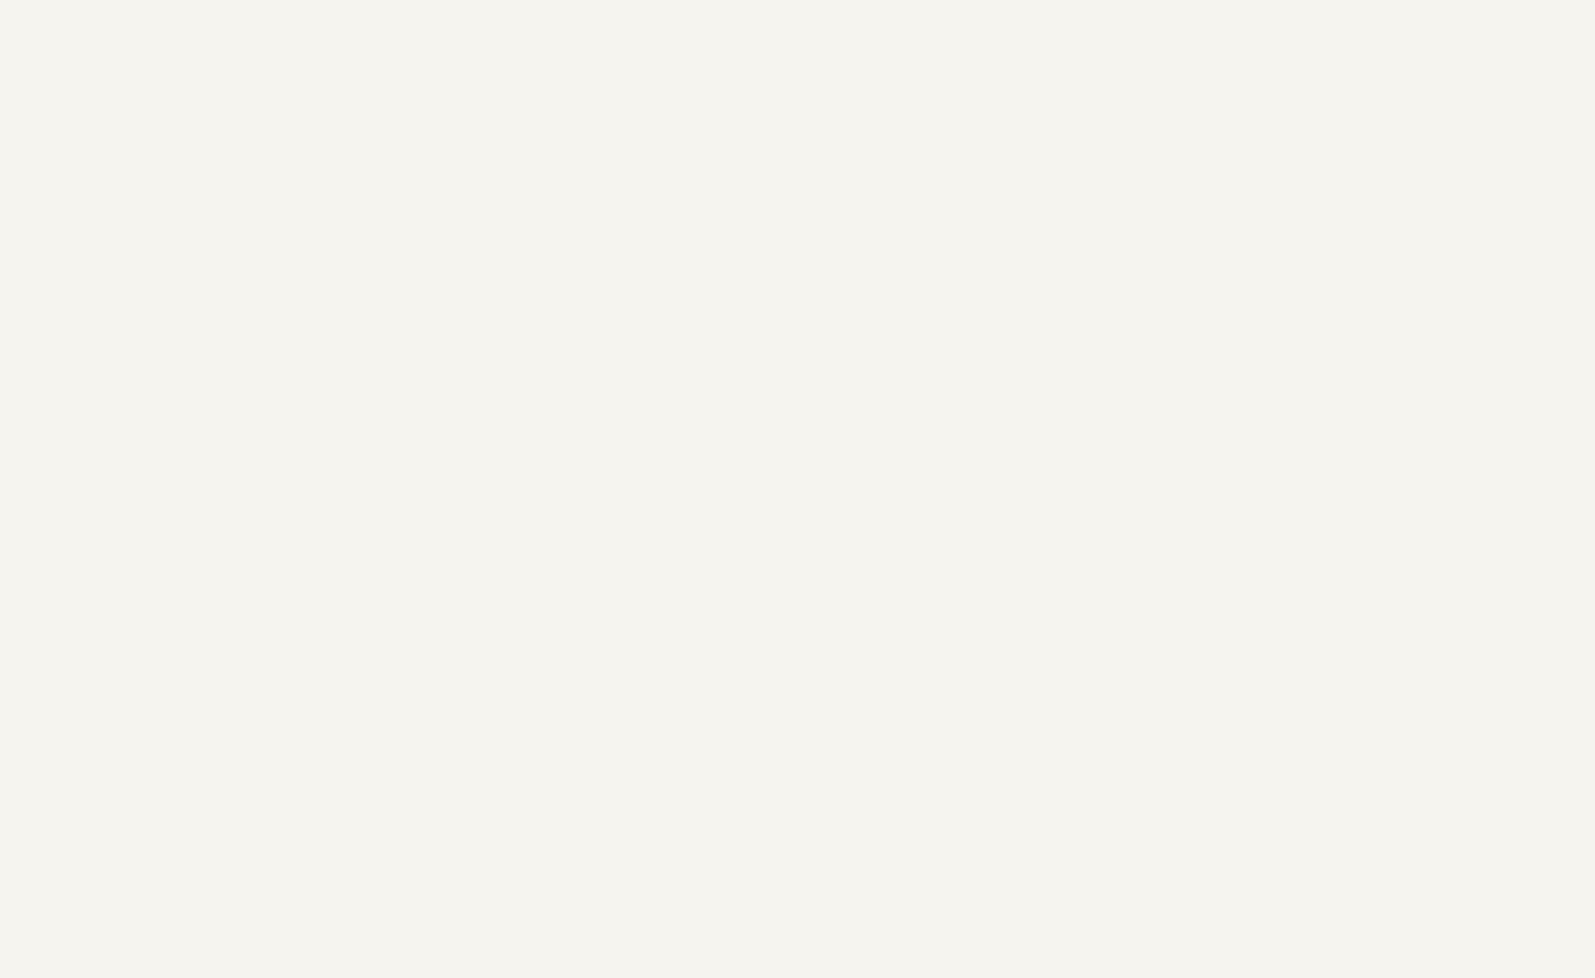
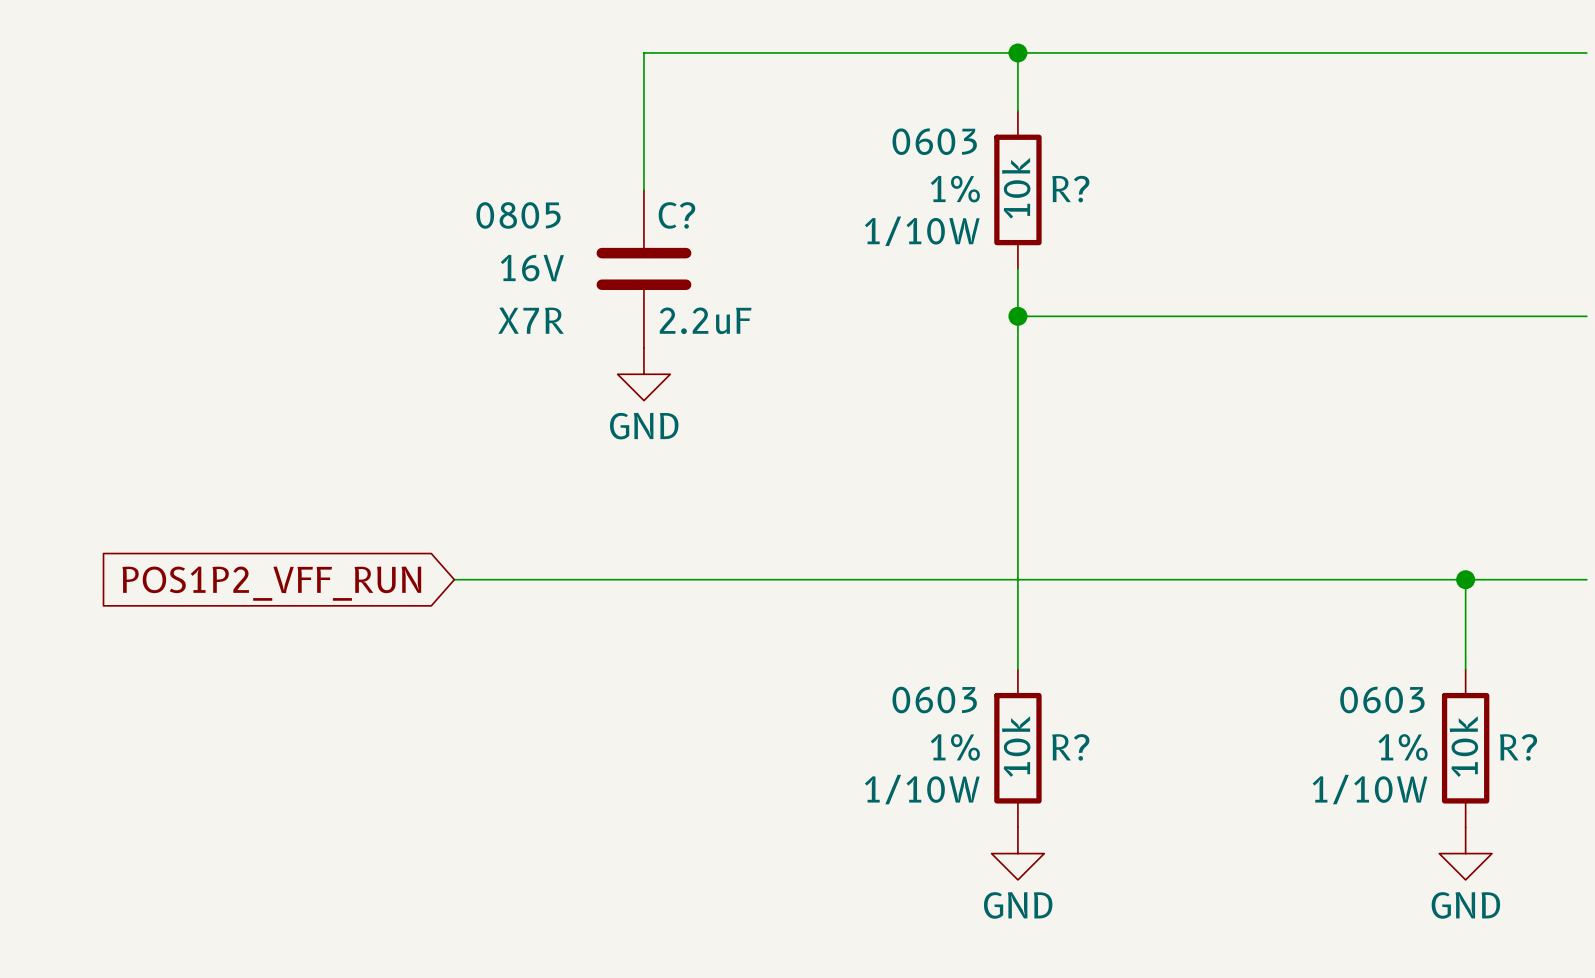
wire: none -> (1017, 52) (1017, 110)
junction: none -> (1017, 52)
wire: none -> (1586, 52) (643, 52) (643, 189)
R?: none -> 10k (1017, 189)
C?: none -> 2.2uF (643, 268)
wire: none -> (1017, 268) (1017, 669)
wire: none -> (1017, 316) (1586, 316)
junction: none -> (1017, 316)
power symbol: none -> GND (643, 374)
wire: none -> (454, 579) (1586, 579)
wire: none -> (1465, 579) (1465, 669)
junction: none -> (1465, 579)
global label: none -> POS1P2_VFF_RUN (271, 583)
R?: none -> 10k (1017, 748)
R?: none -> 10k (1465, 748)
power symbol: none -> GND (1017, 853)
power symbol: none -> GND (1465, 853)

